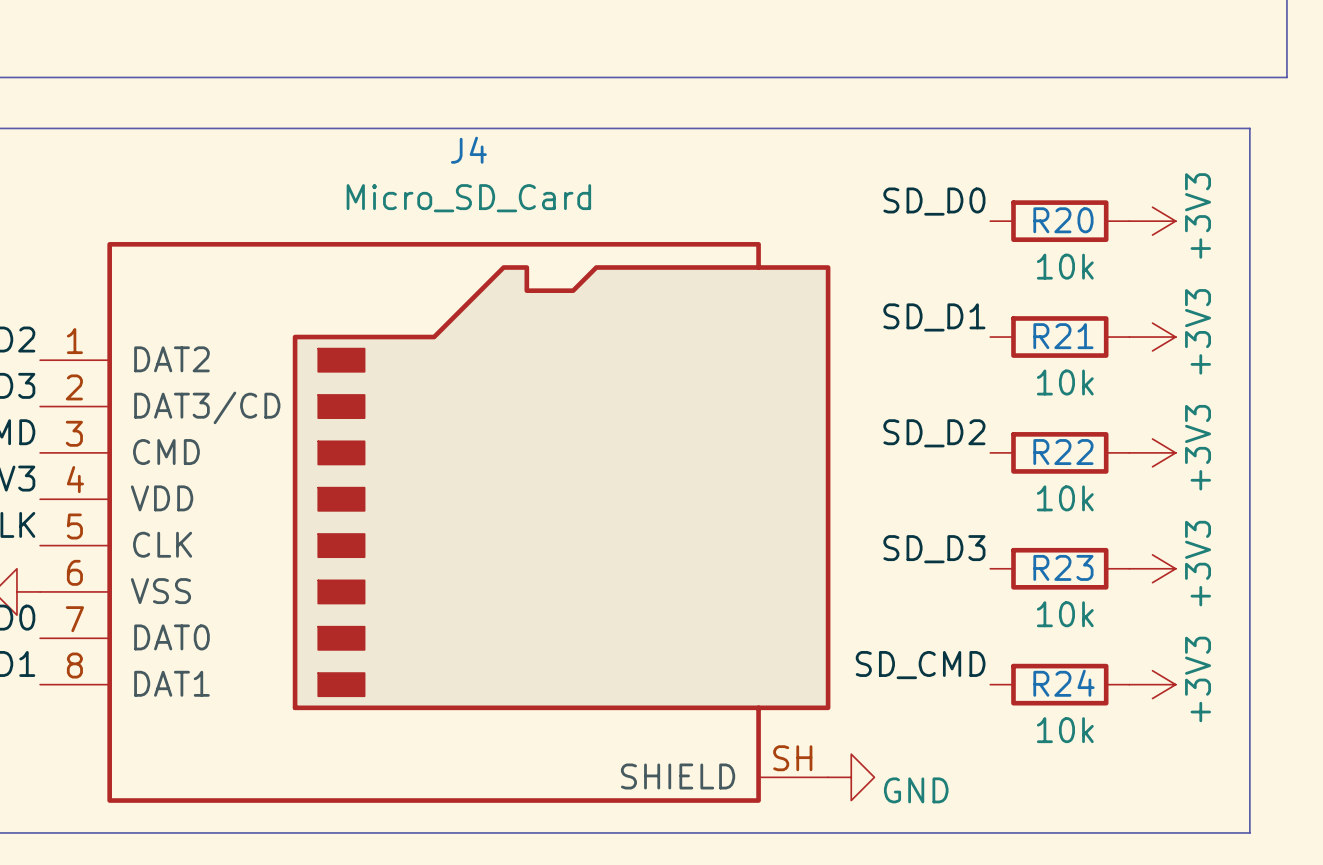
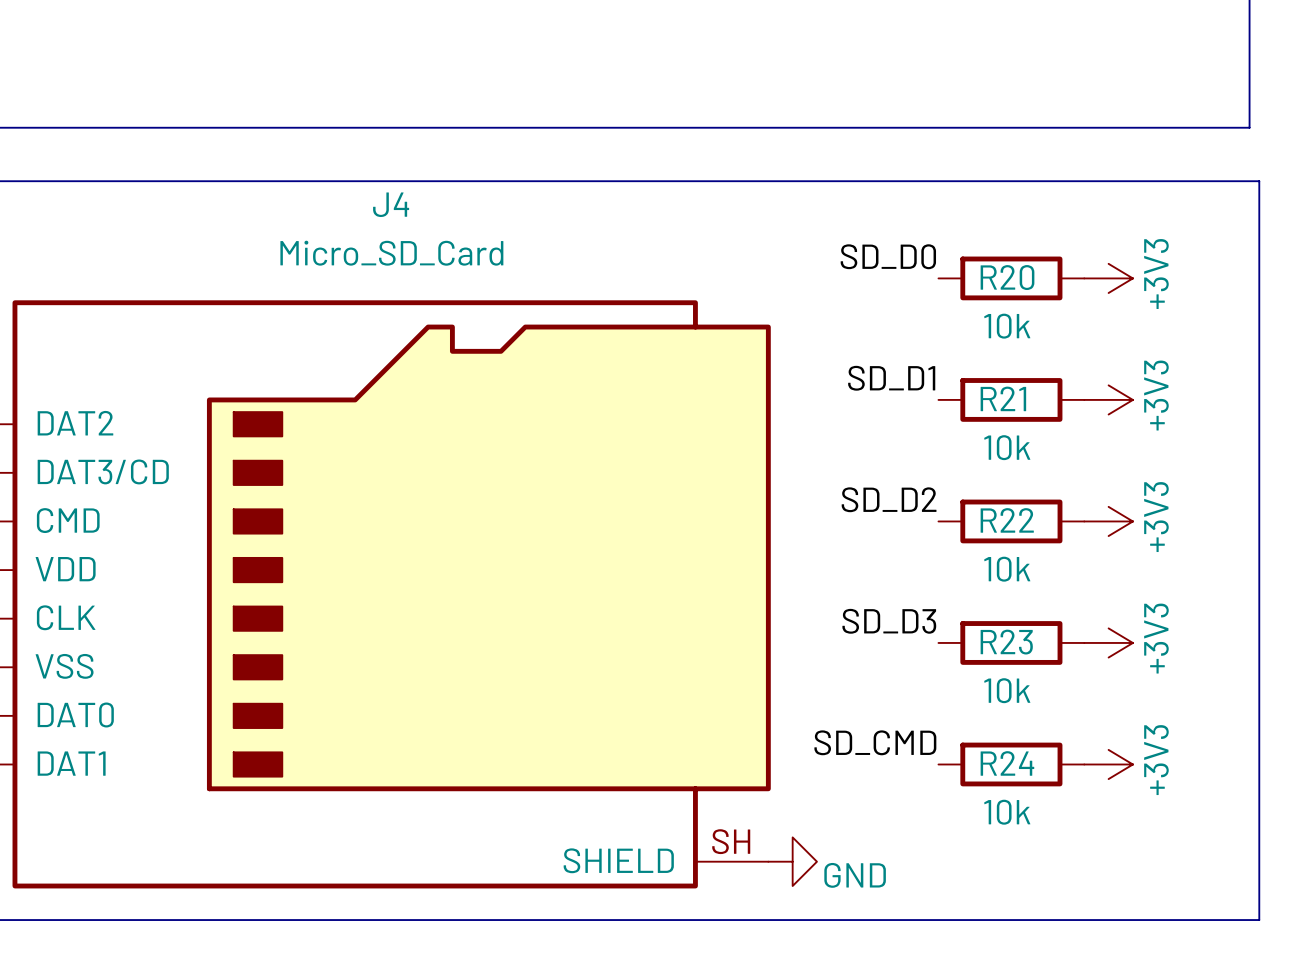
line: (1249, 128) (1249, 832) -> (1210, 181) (1259, 181) (1259, 920) (1210, 920)

